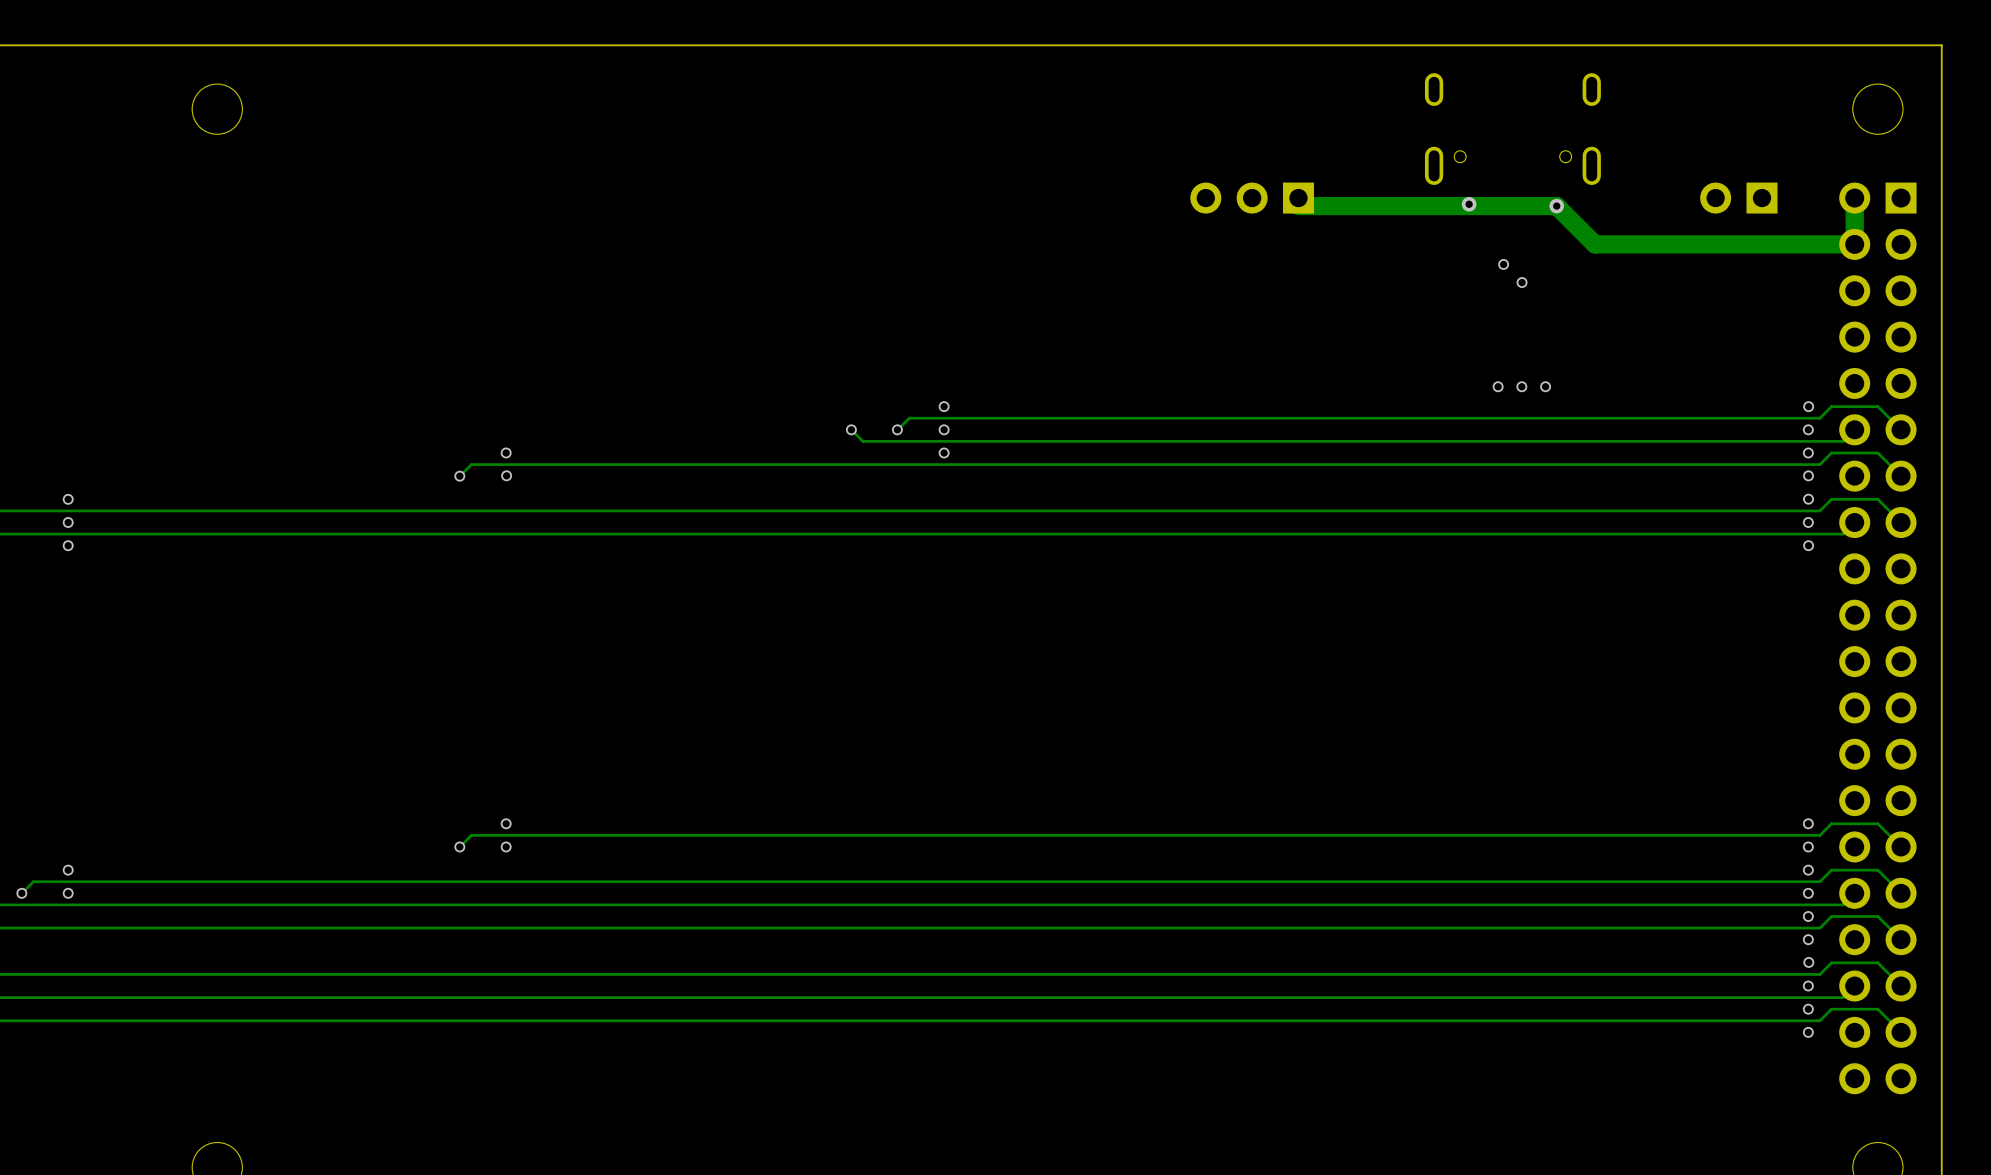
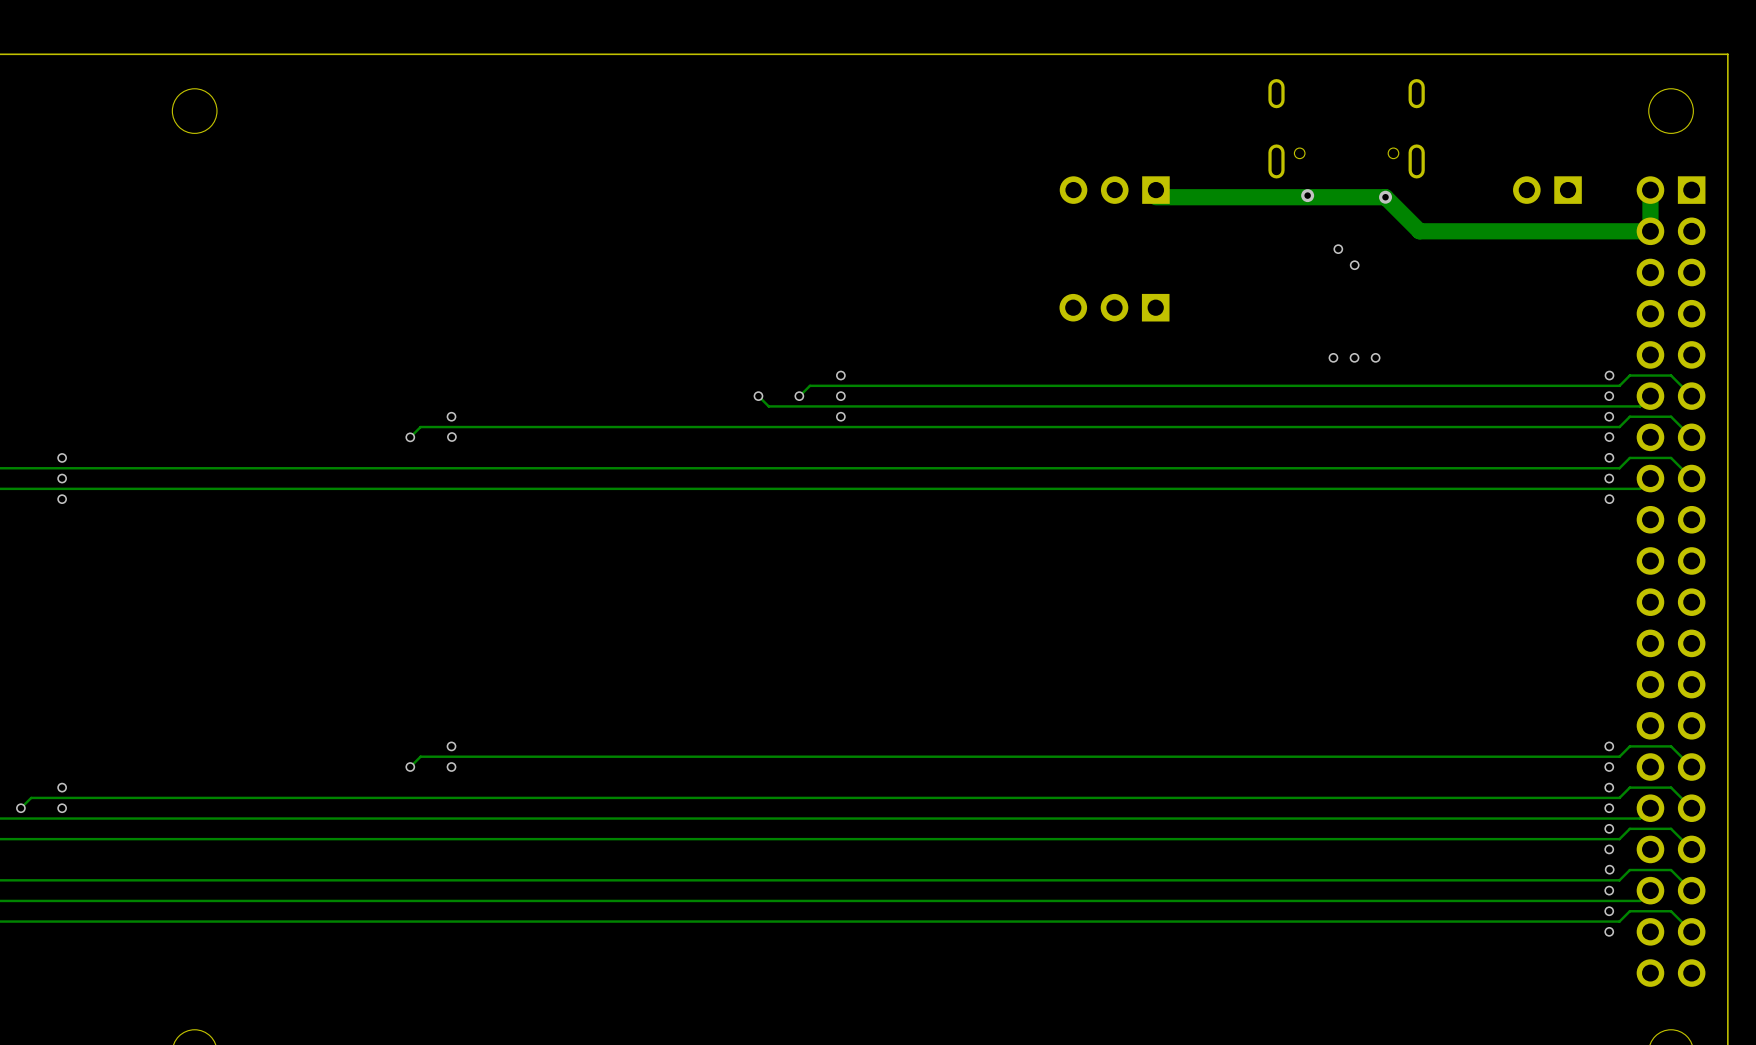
part: none -> (1114, 307)

